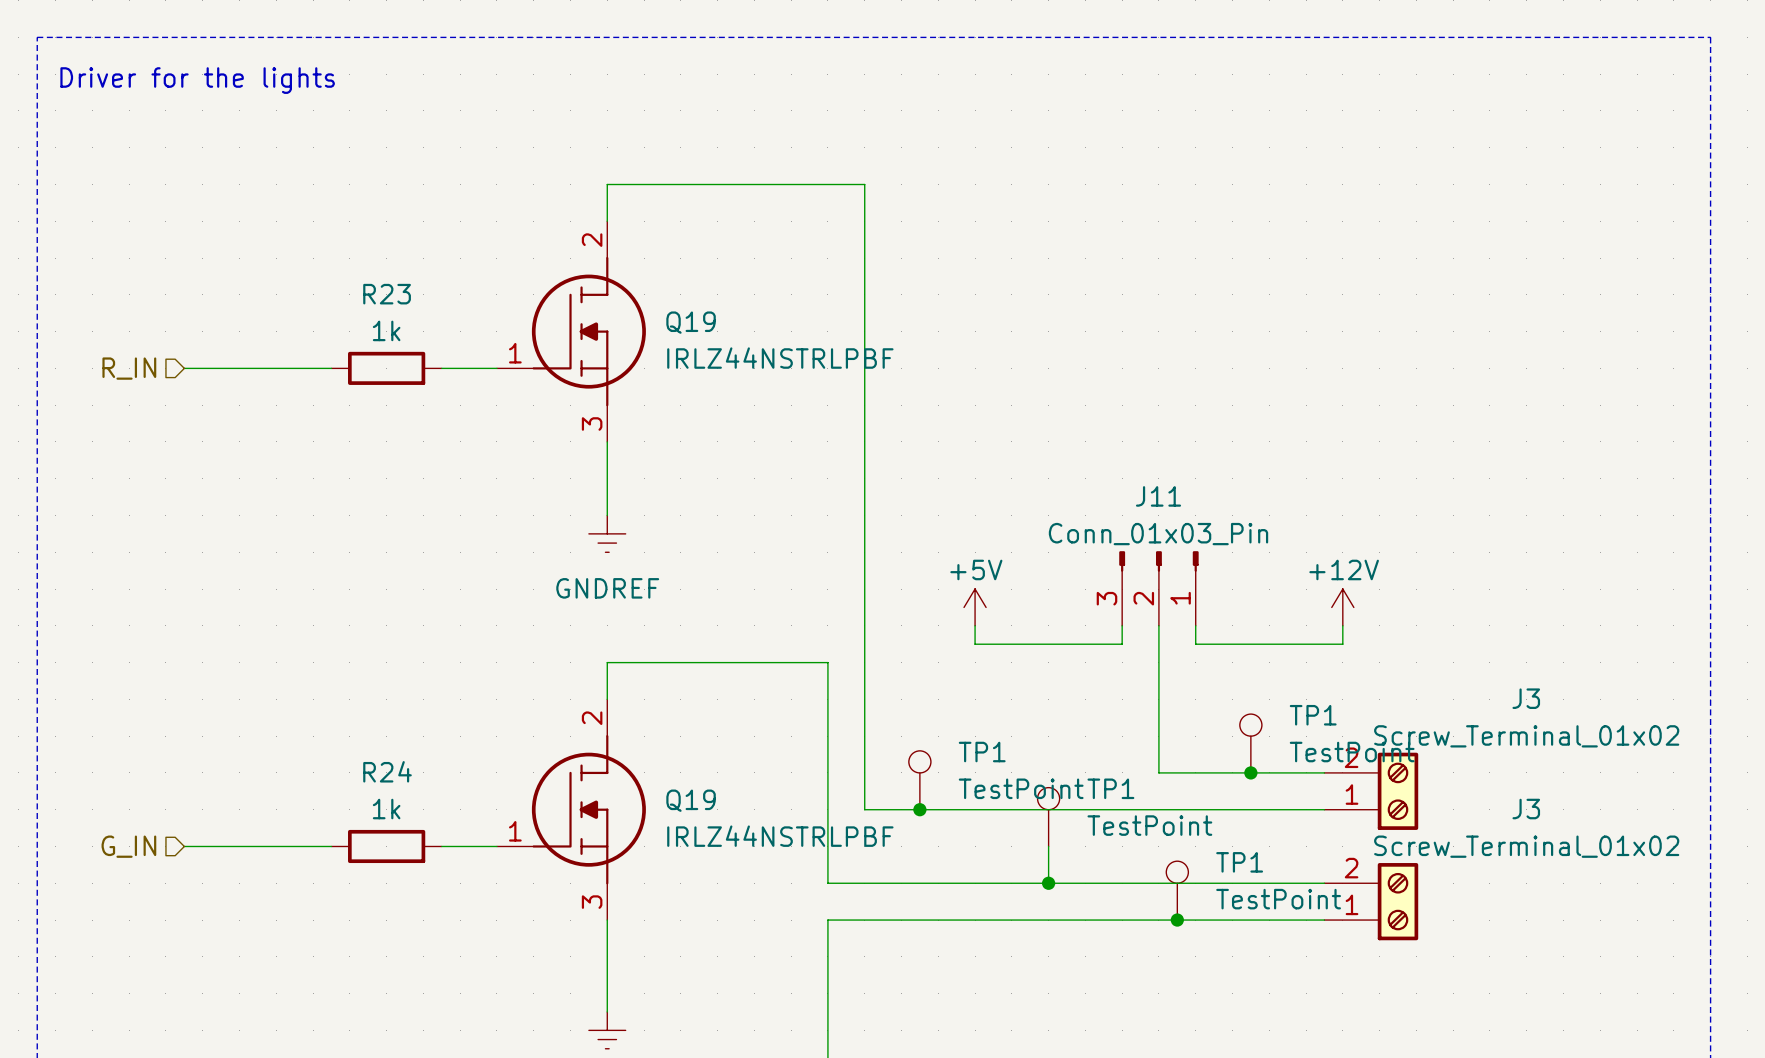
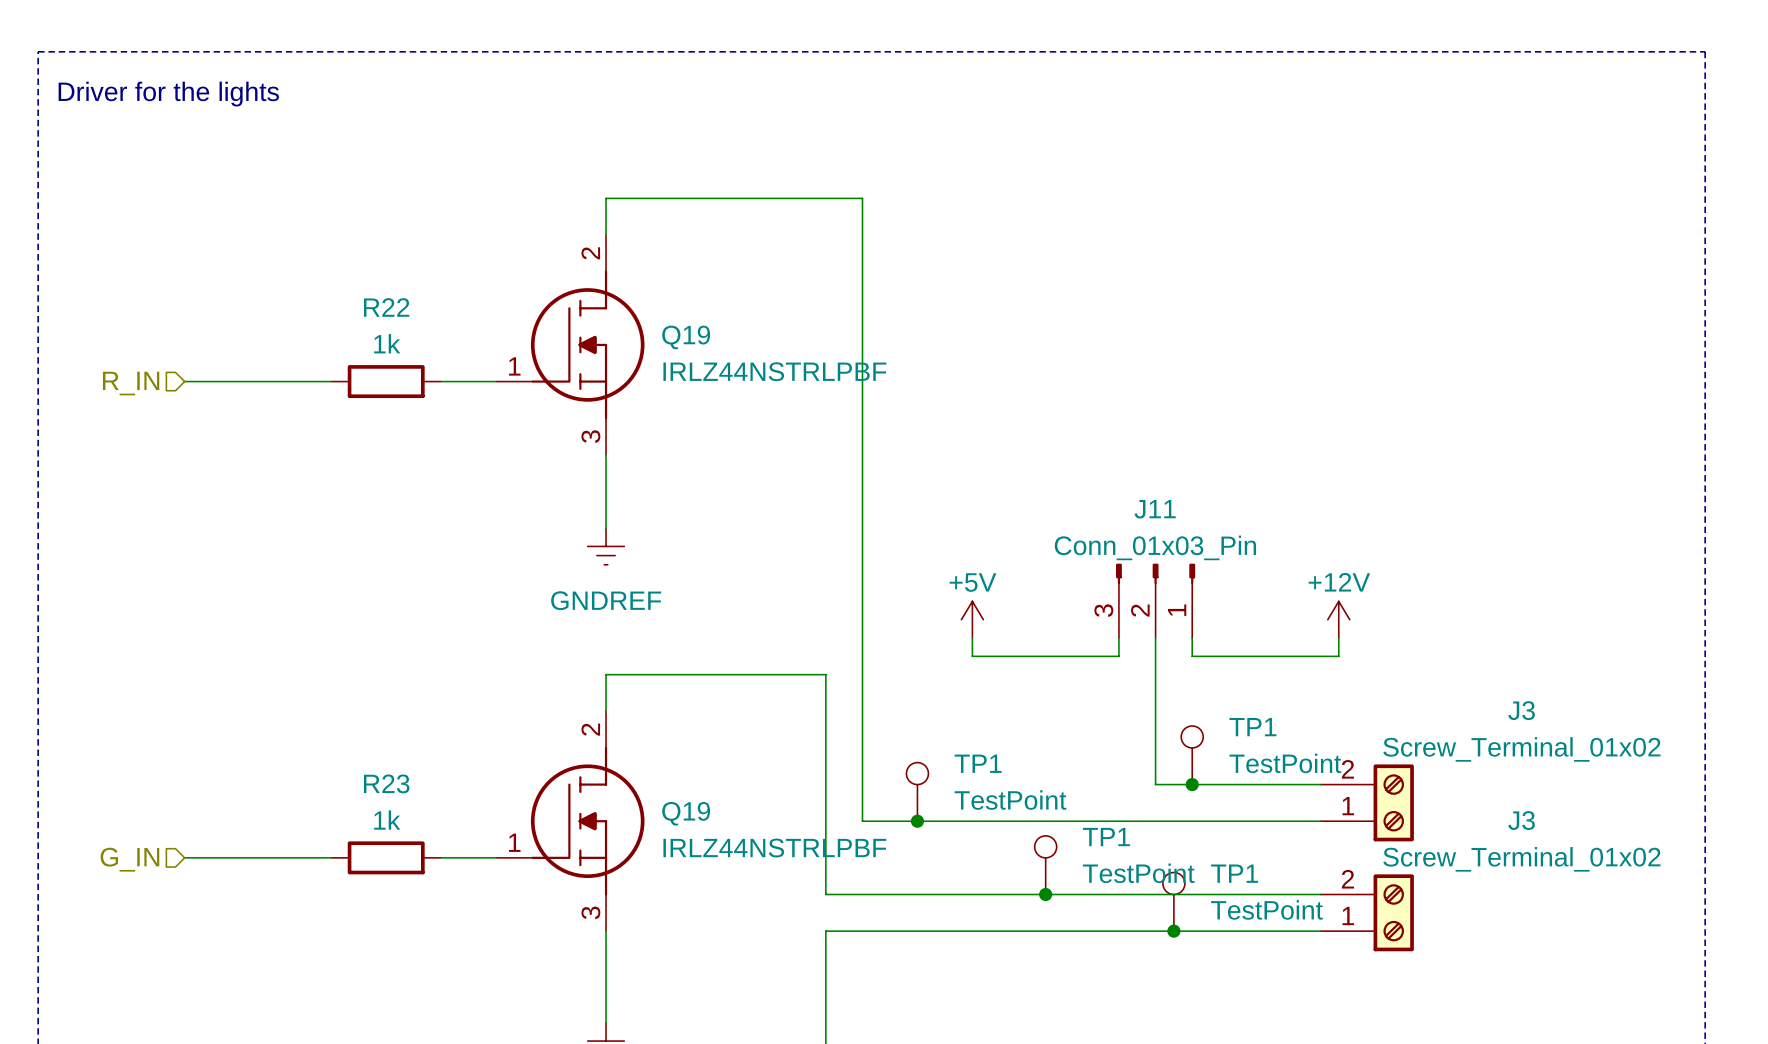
R23 name: R23 (387, 294) -> R22 (386, 307)
TP1 position: (1250, 743) -> (1192, 755)
R24 name: R24 (387, 771) -> R23 (386, 783)
junction position: (1250, 772) -> (1192, 784)
TP1 position: (1048, 817) -> (1045, 865)

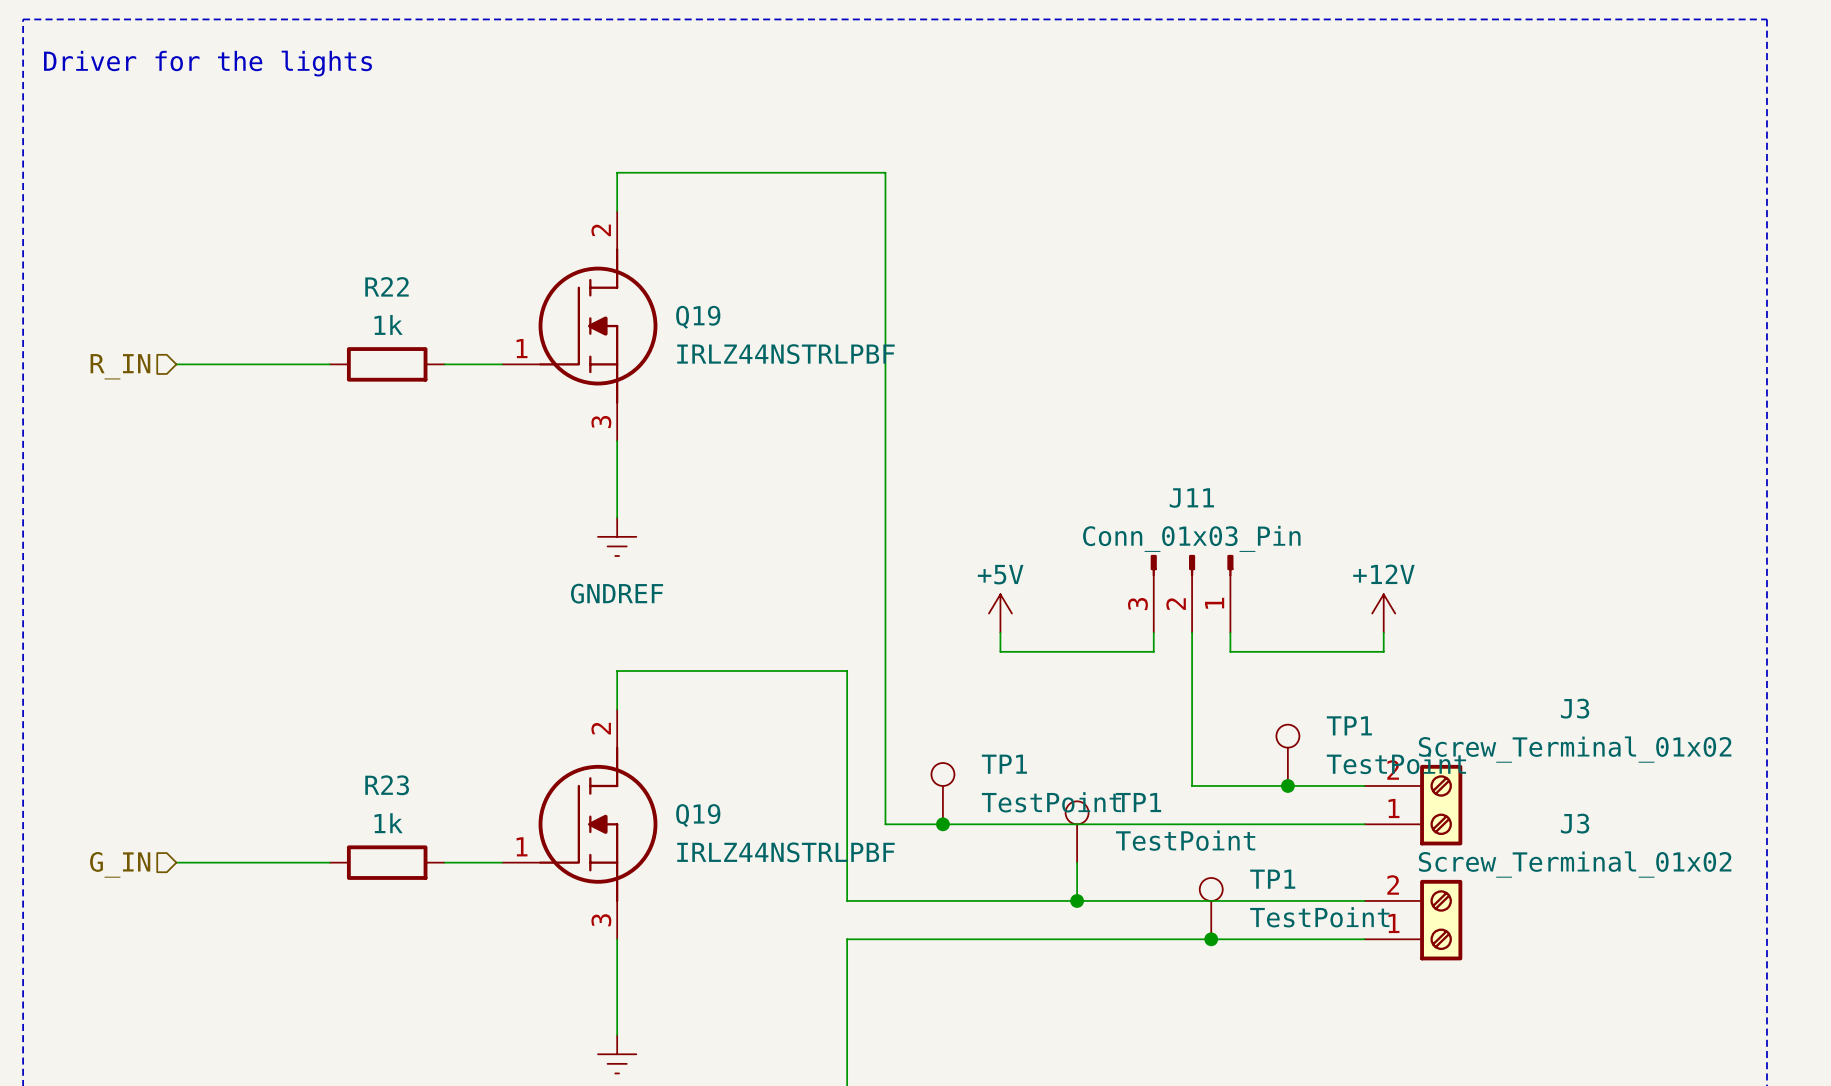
TP1 position: (1192, 755) -> (1287, 755)
junction position: (1192, 784) -> (1287, 785)
TP1 position: (1045, 865) -> (1077, 831)

